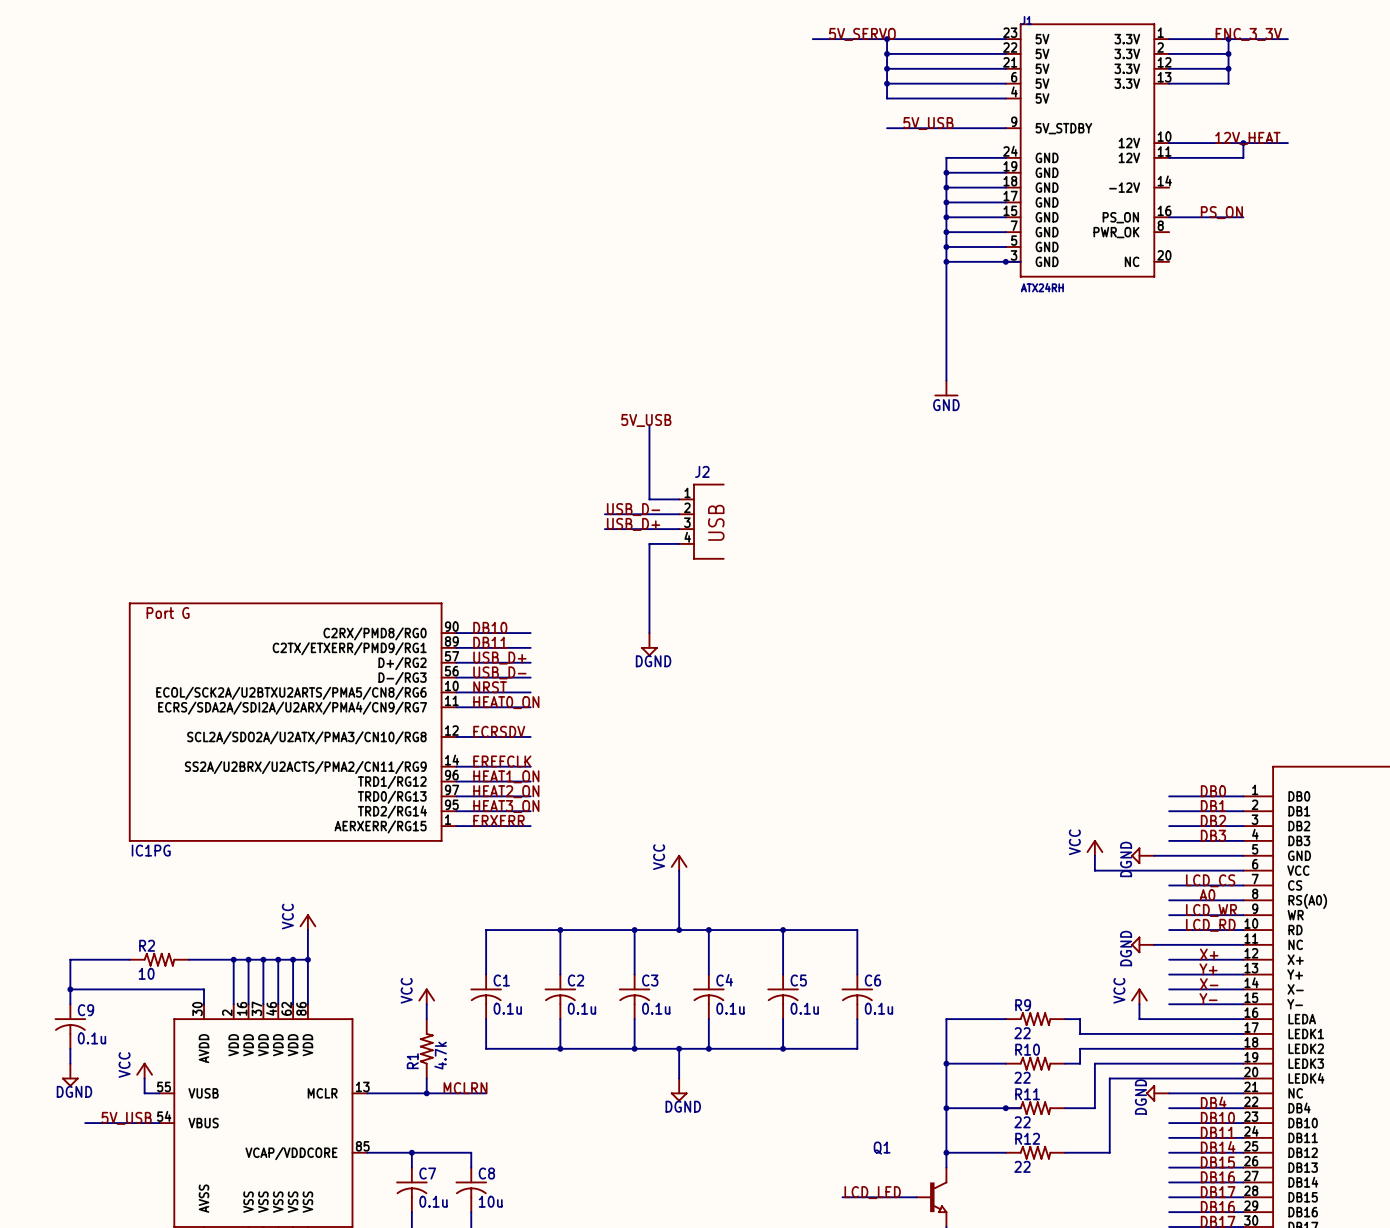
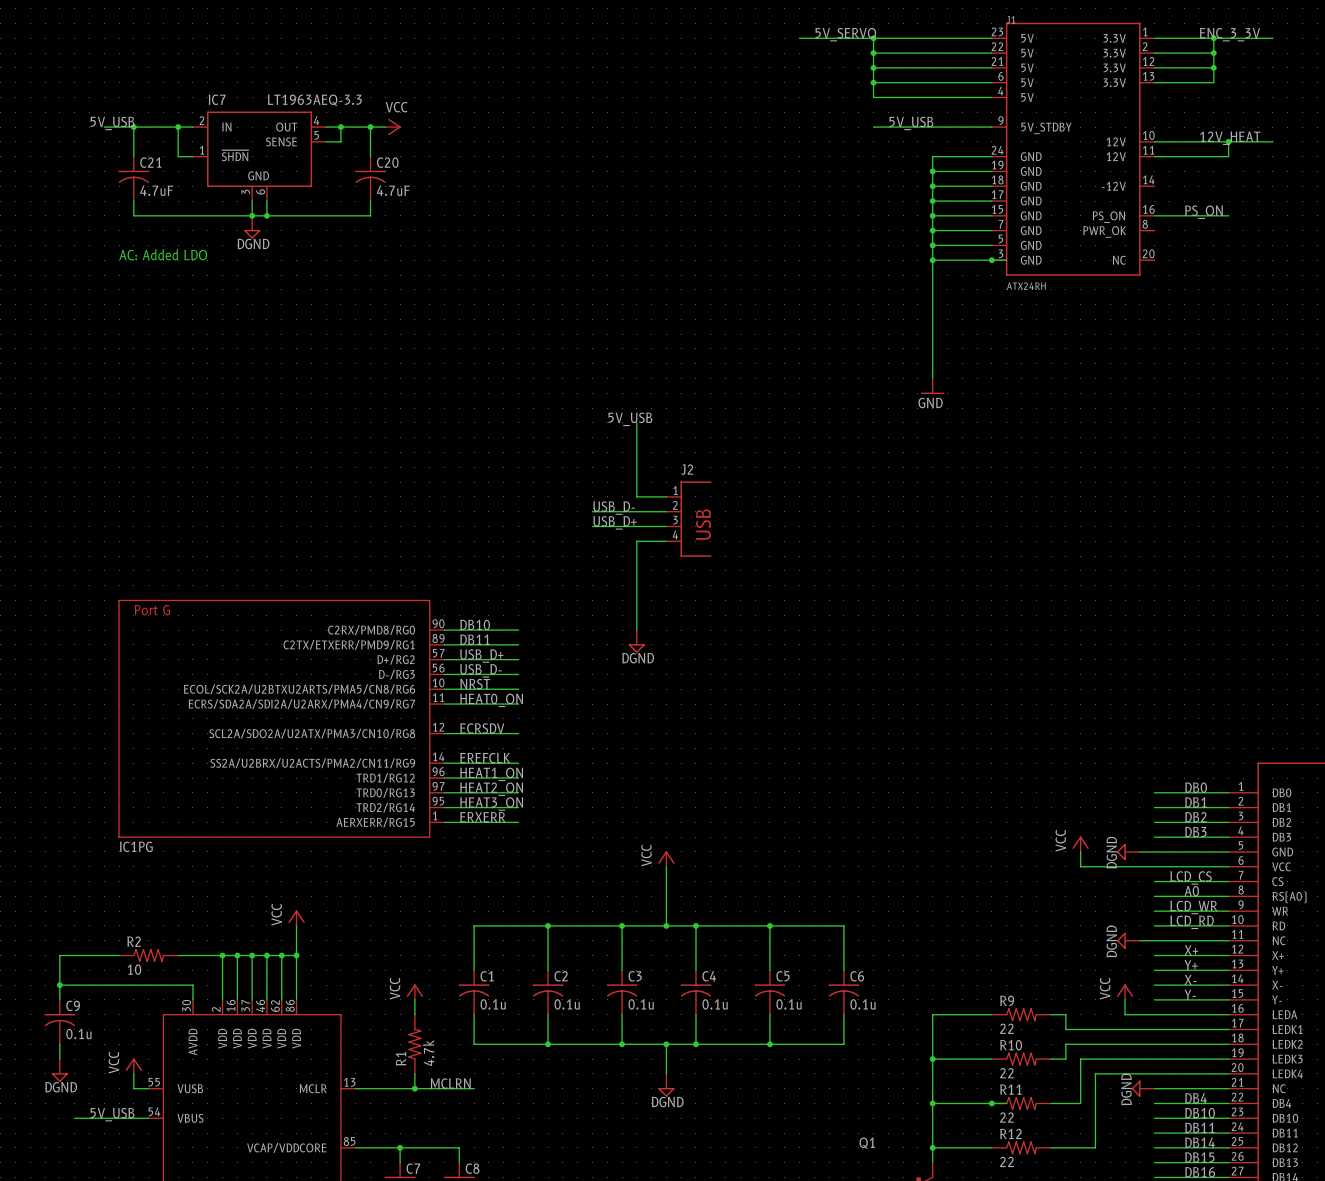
label: none -> 5V_USB (112, 123)
wire: none -> (104, 127) (192, 127)
wire: none -> (133, 127) (133, 156)
junction: none -> (133, 127)
wire: none -> (178, 127) (178, 156) (192, 156)
junction: none -> (178, 127)
wire: none -> (326, 127) (385, 127)
wire: none -> (340, 127) (340, 141) (326, 141)
junction: none -> (340, 127)
wire: none -> (370, 127) (370, 156)
junction: none -> (370, 127)
power symbol: none -> VCC (393, 127)
IC7: none -> LT1963AEQ-3.3 (259, 156)
C21: none -> 4.7uF (133, 178)
C20: none -> 4.7uF (370, 178)
wire: none -> (133, 201) (133, 215) (370, 215) (370, 201)
wire: none -> (252, 201) (252, 215)
wire: none -> (266, 201) (266, 215)
junction: none -> (252, 215)
junction: none -> (266, 215)
power symbol: none -> DGND (252, 227)
text: none -> AC: Added LDO (163, 254)

